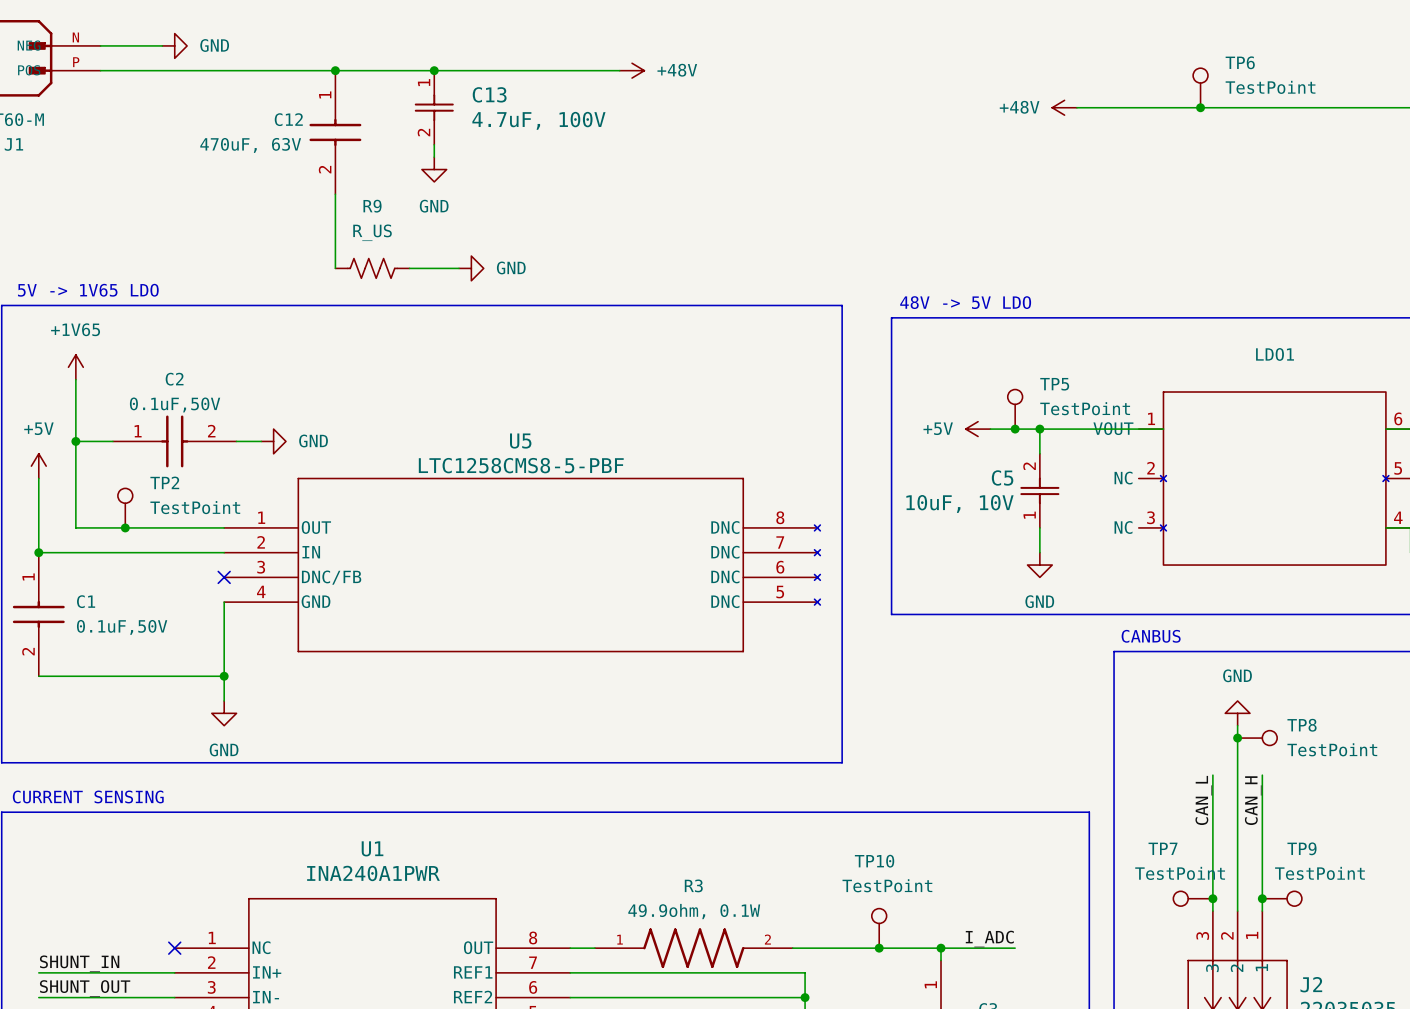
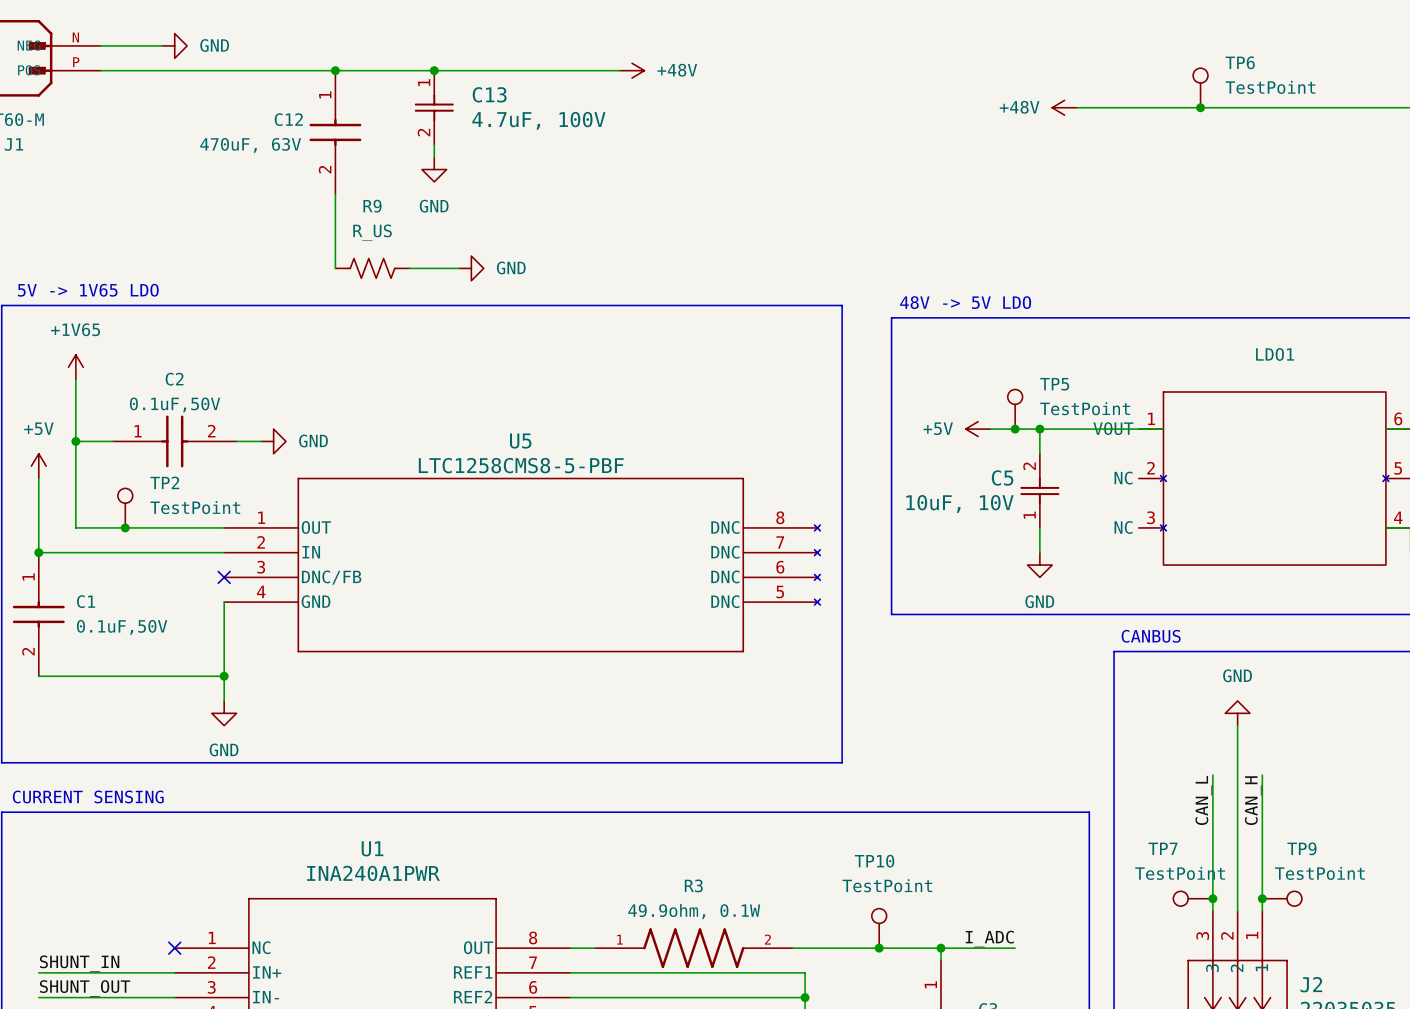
junction: (1237, 738) -> none
TP8: TestPoint (1257, 738) -> none

